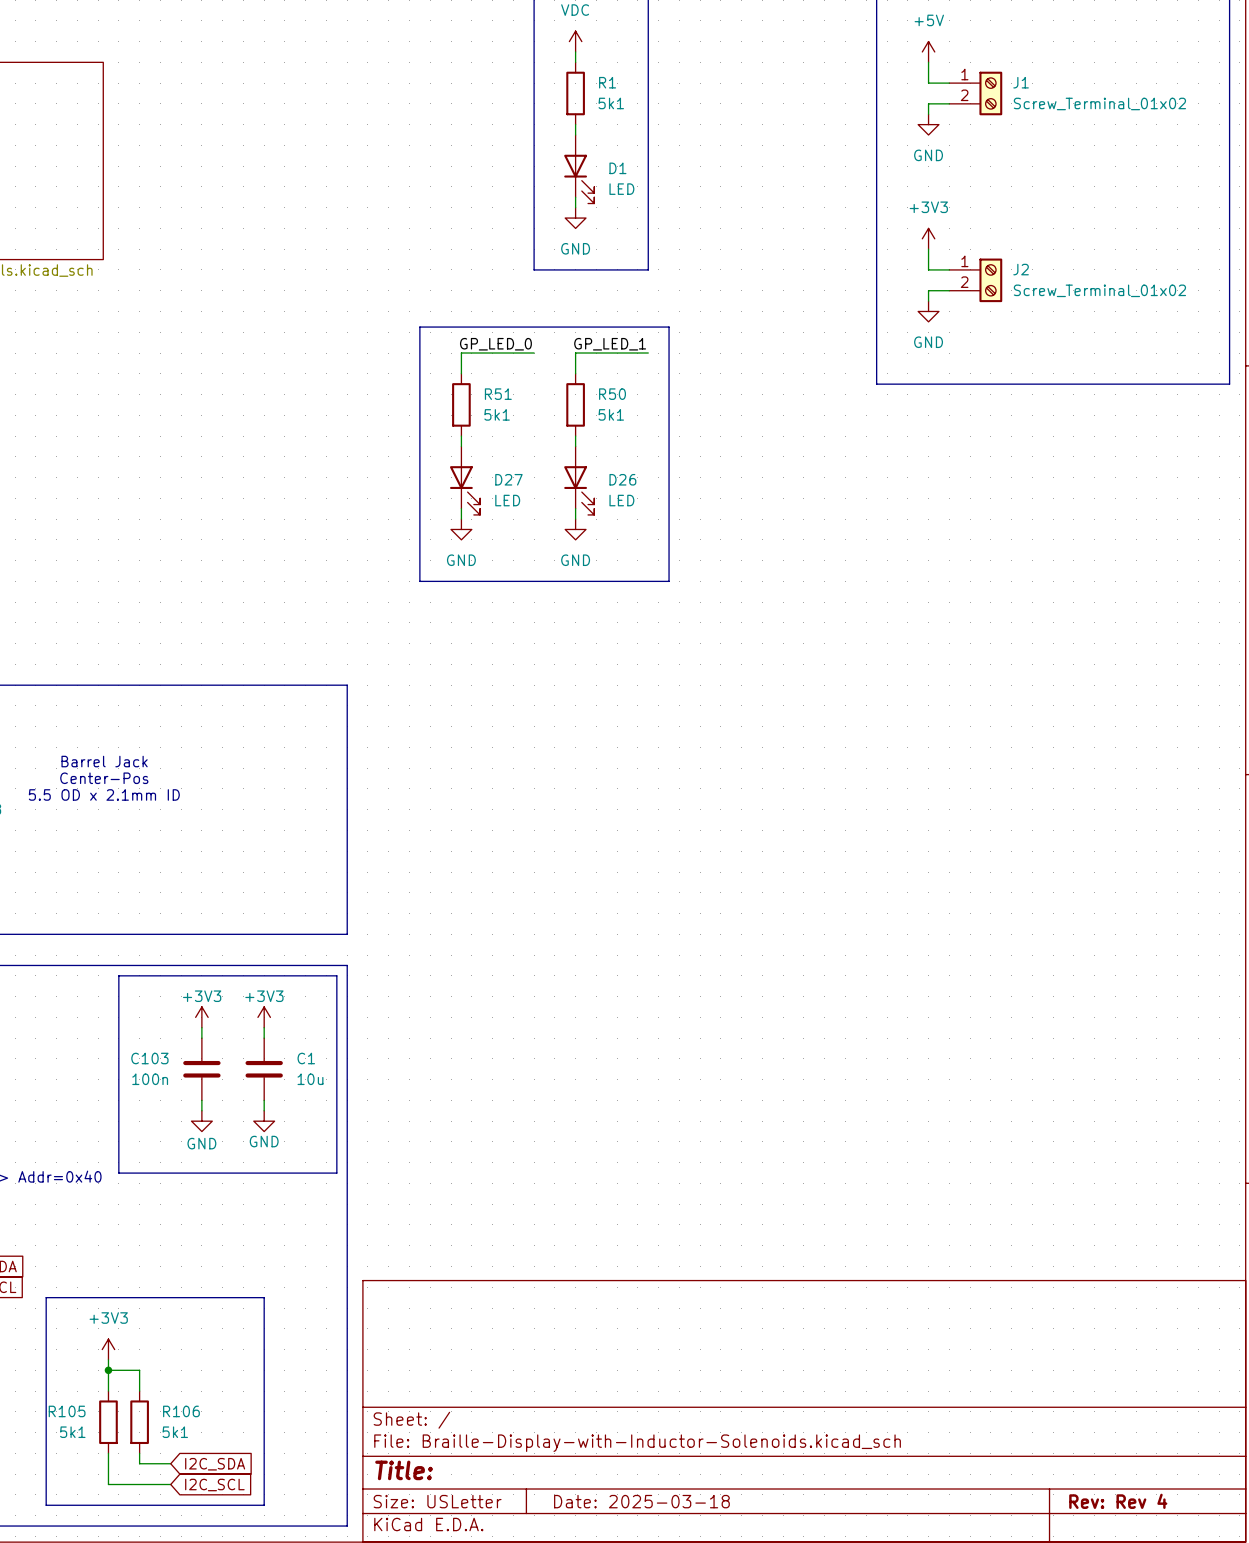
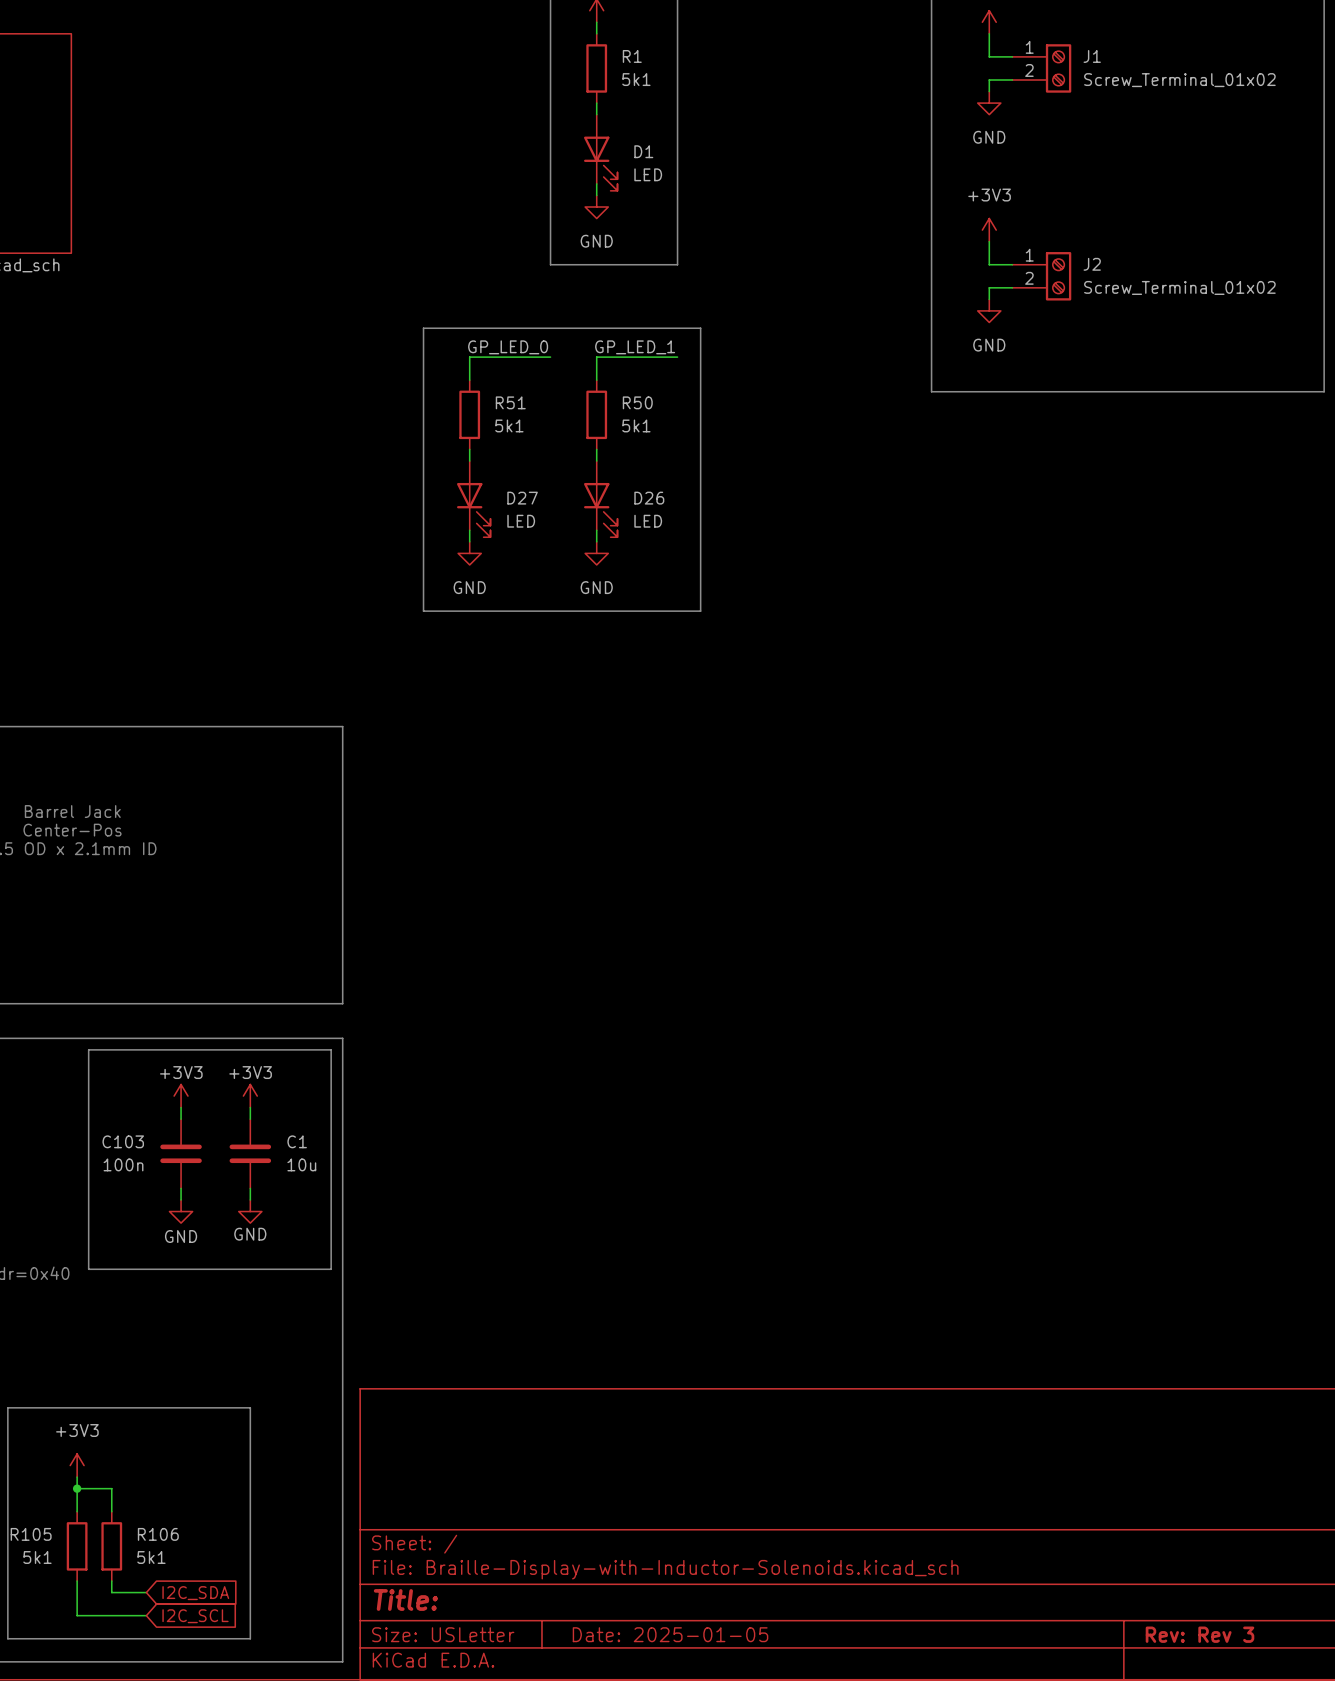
title block: Date: 2025-03-18 (641, 1501) -> Date: 2025-01-05 (670, 1634)
title block: Rev: Rev 4 (1118, 1501) -> Rev: Rev 3 (1200, 1634)

